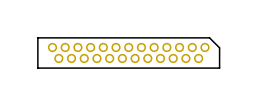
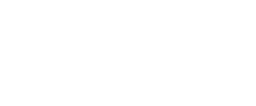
part: (128, 52) -> none

